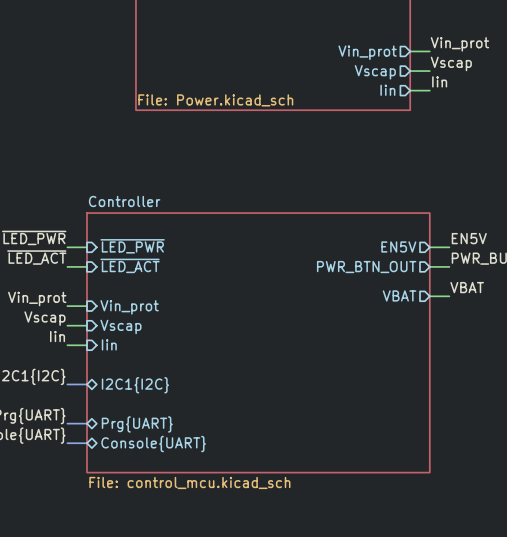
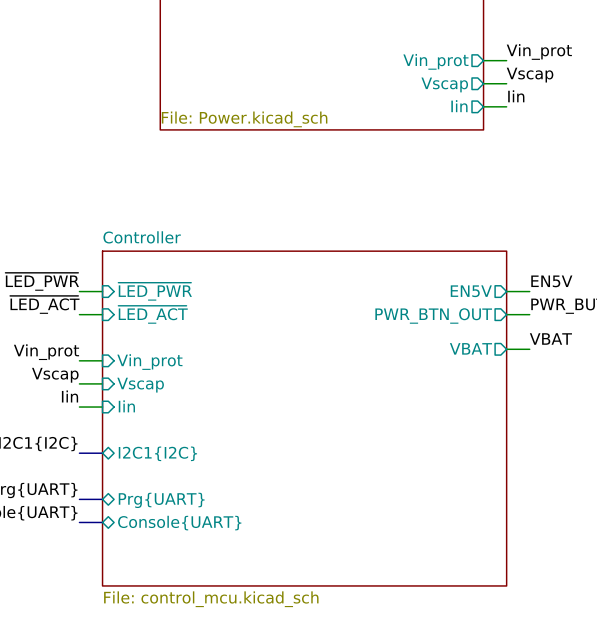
sheet Controller: File: control_mcu.kicad_sch (258, 342) -> none
sheet Controller: none -> File: control_mcu.kicad_sch (304, 418)

